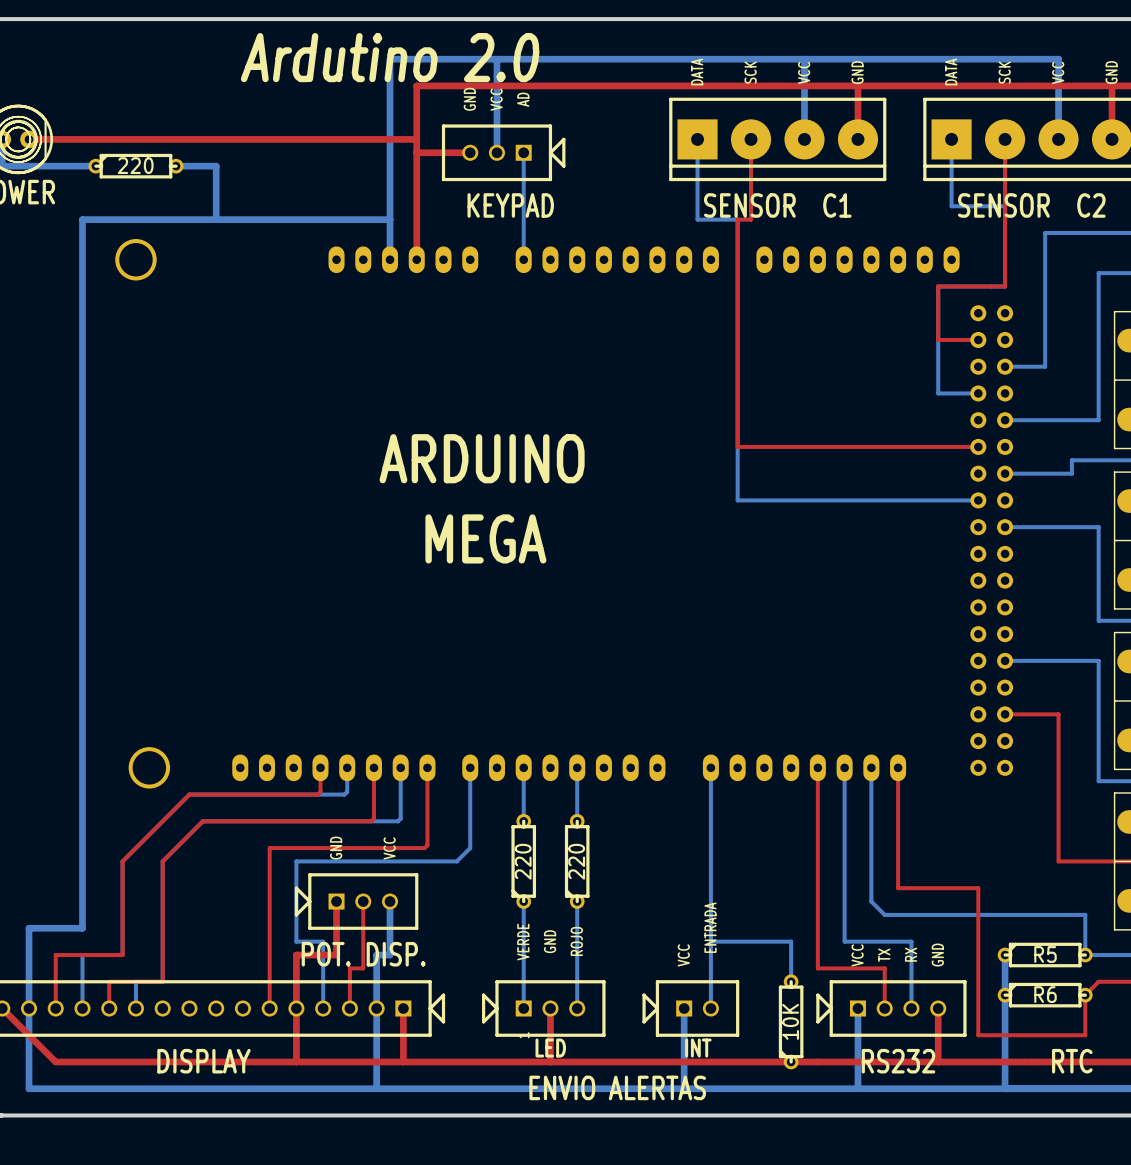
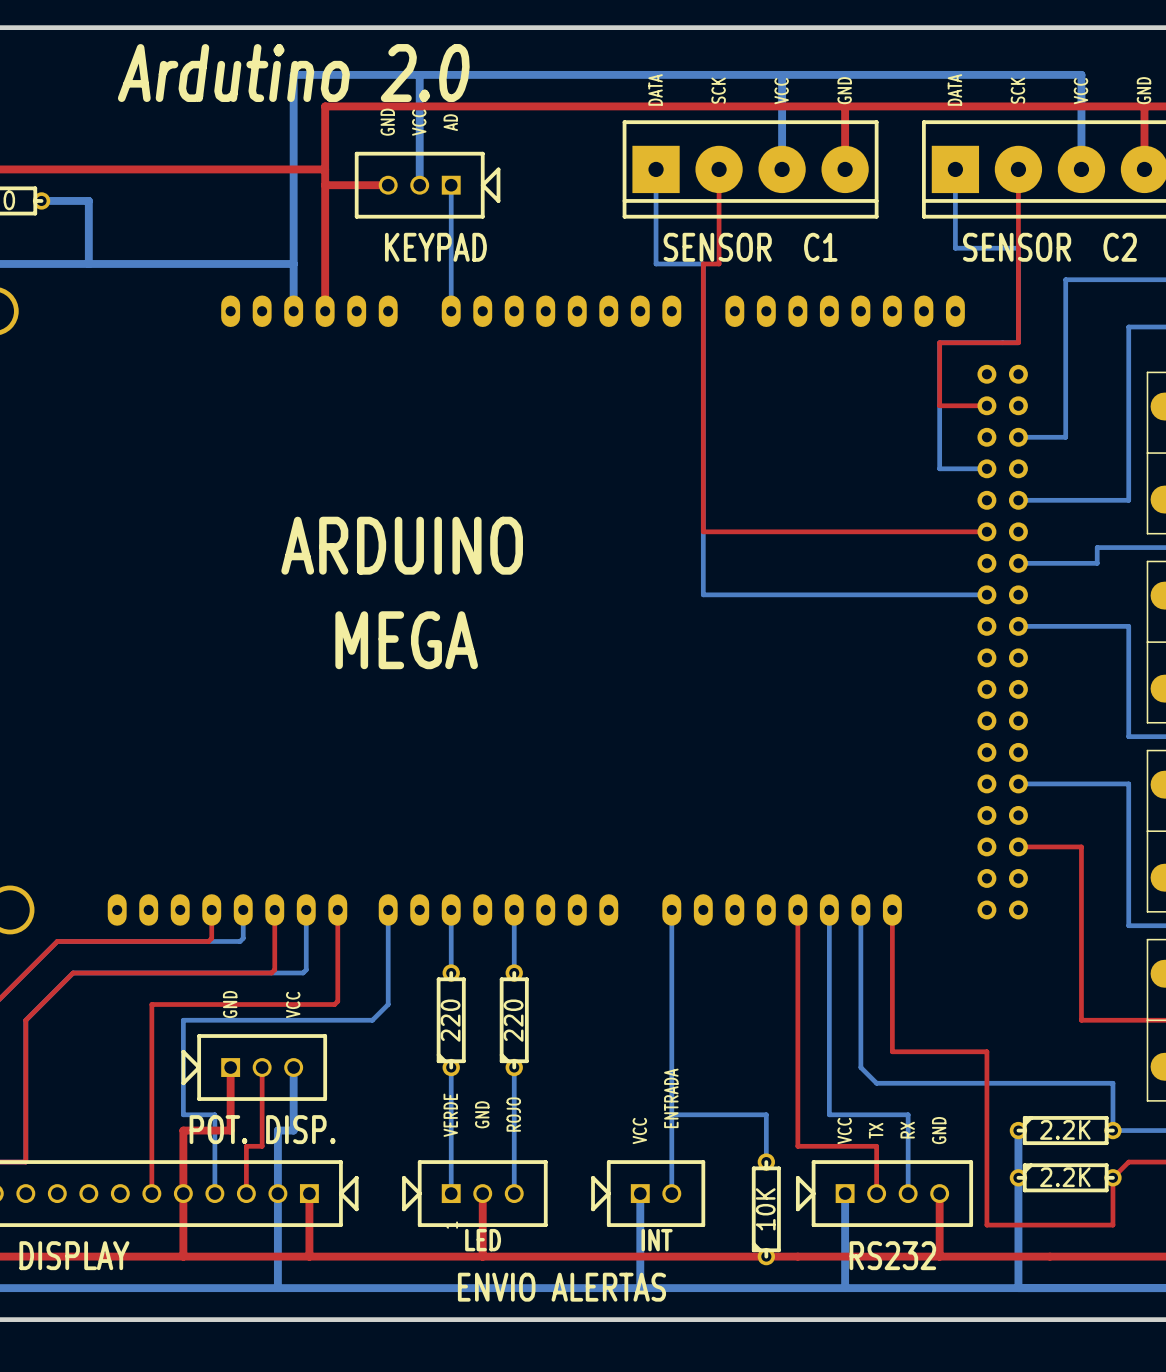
R5 value: none -> 2.2K (1065, 1129)
R5 name: R5 (1045, 954) -> none
R6 value: none -> 2.2K (1065, 1177)
R6 name: R6 (1045, 994) -> none
text: RTC (1072, 1061) -> none

